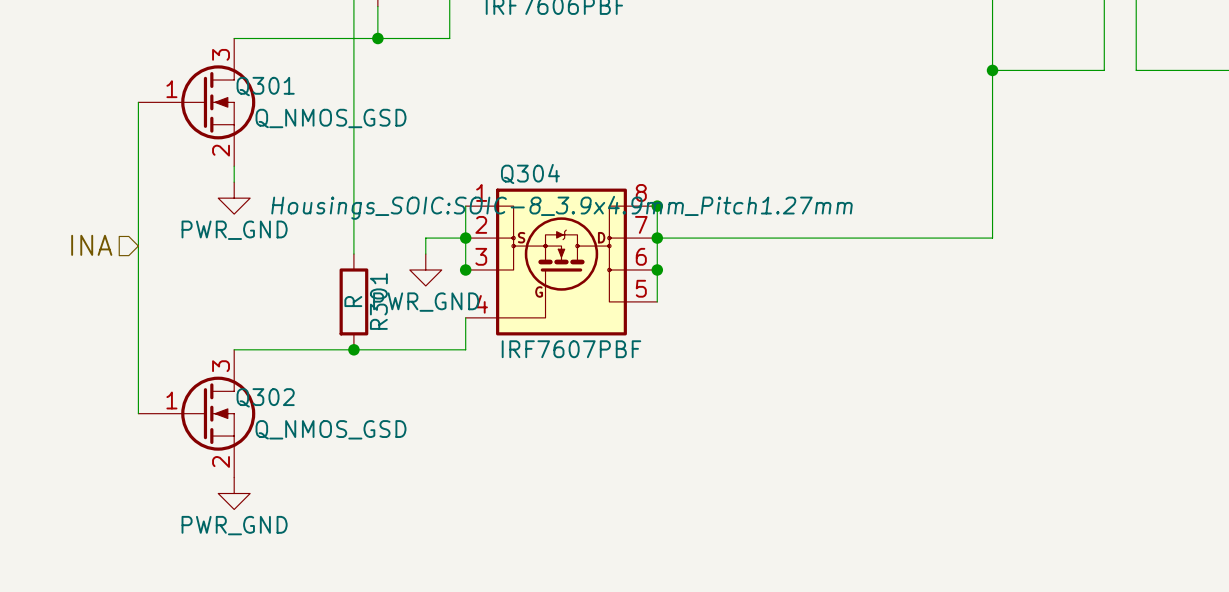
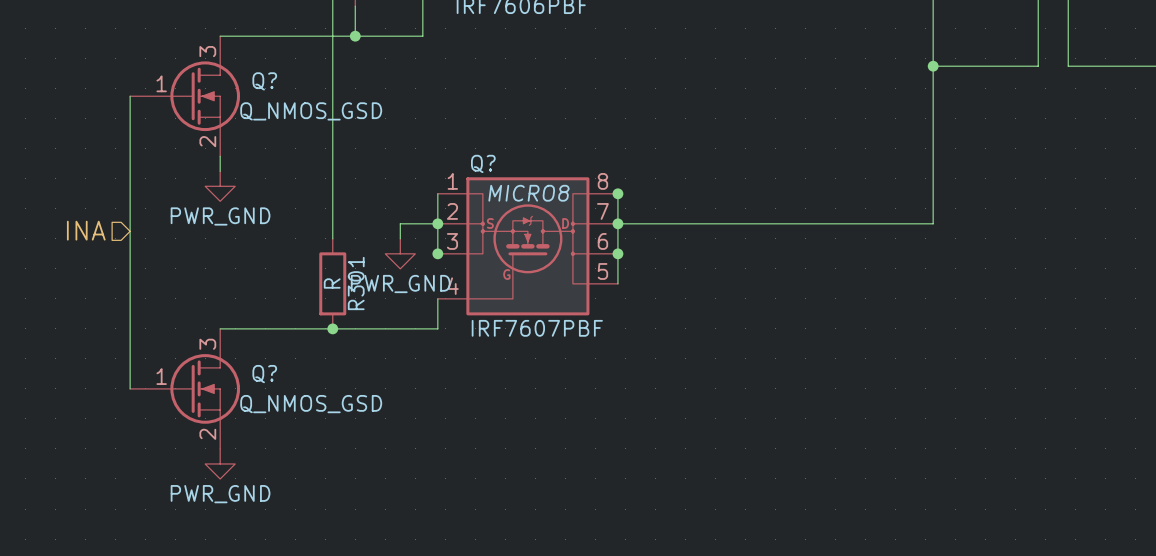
Q301 name: Q301 (265, 86) -> Q? (264, 81)
Q304 name: Q304 (530, 173) -> Q? (483, 163)
Q304 text: Housings_SOIC:SOIC-8_3.9x4.9mm_Pitch1.27mm (562, 207) -> MICRO8 (529, 193)
Q302 name: Q302 (265, 397) -> Q? (264, 374)

